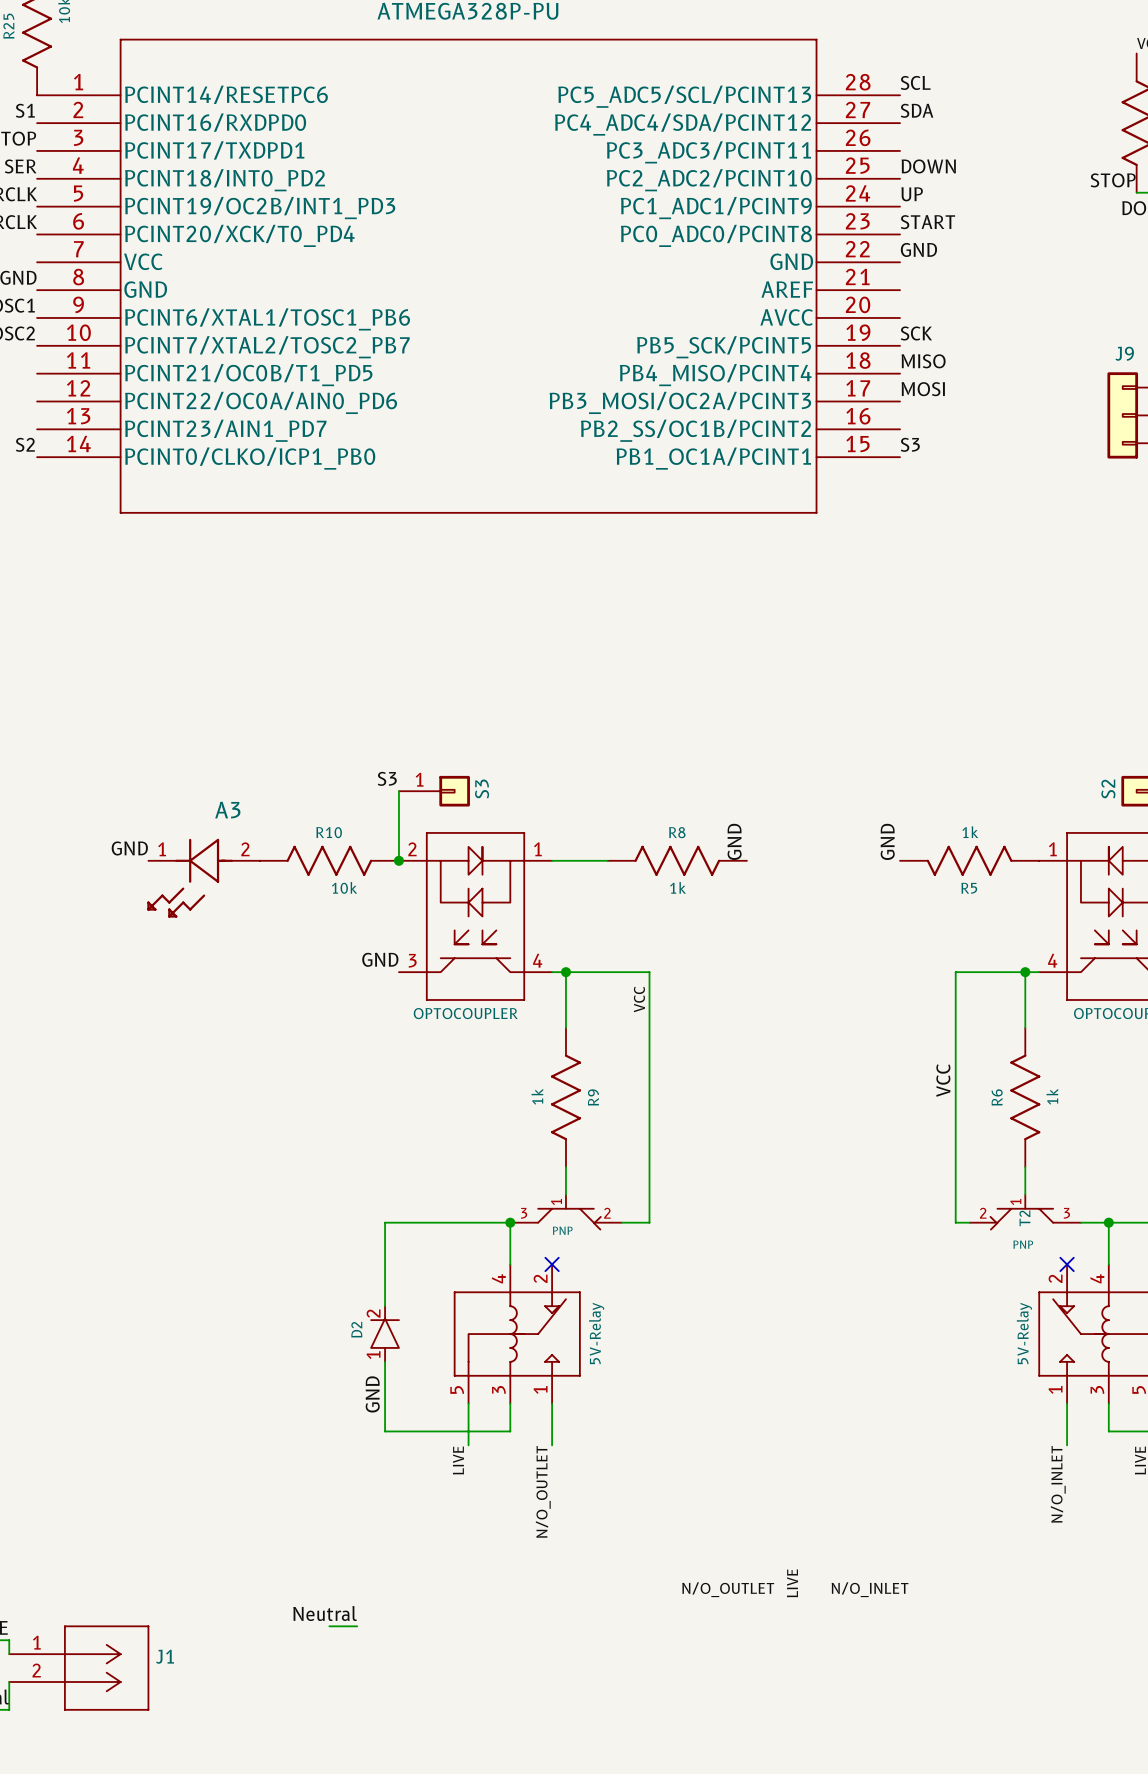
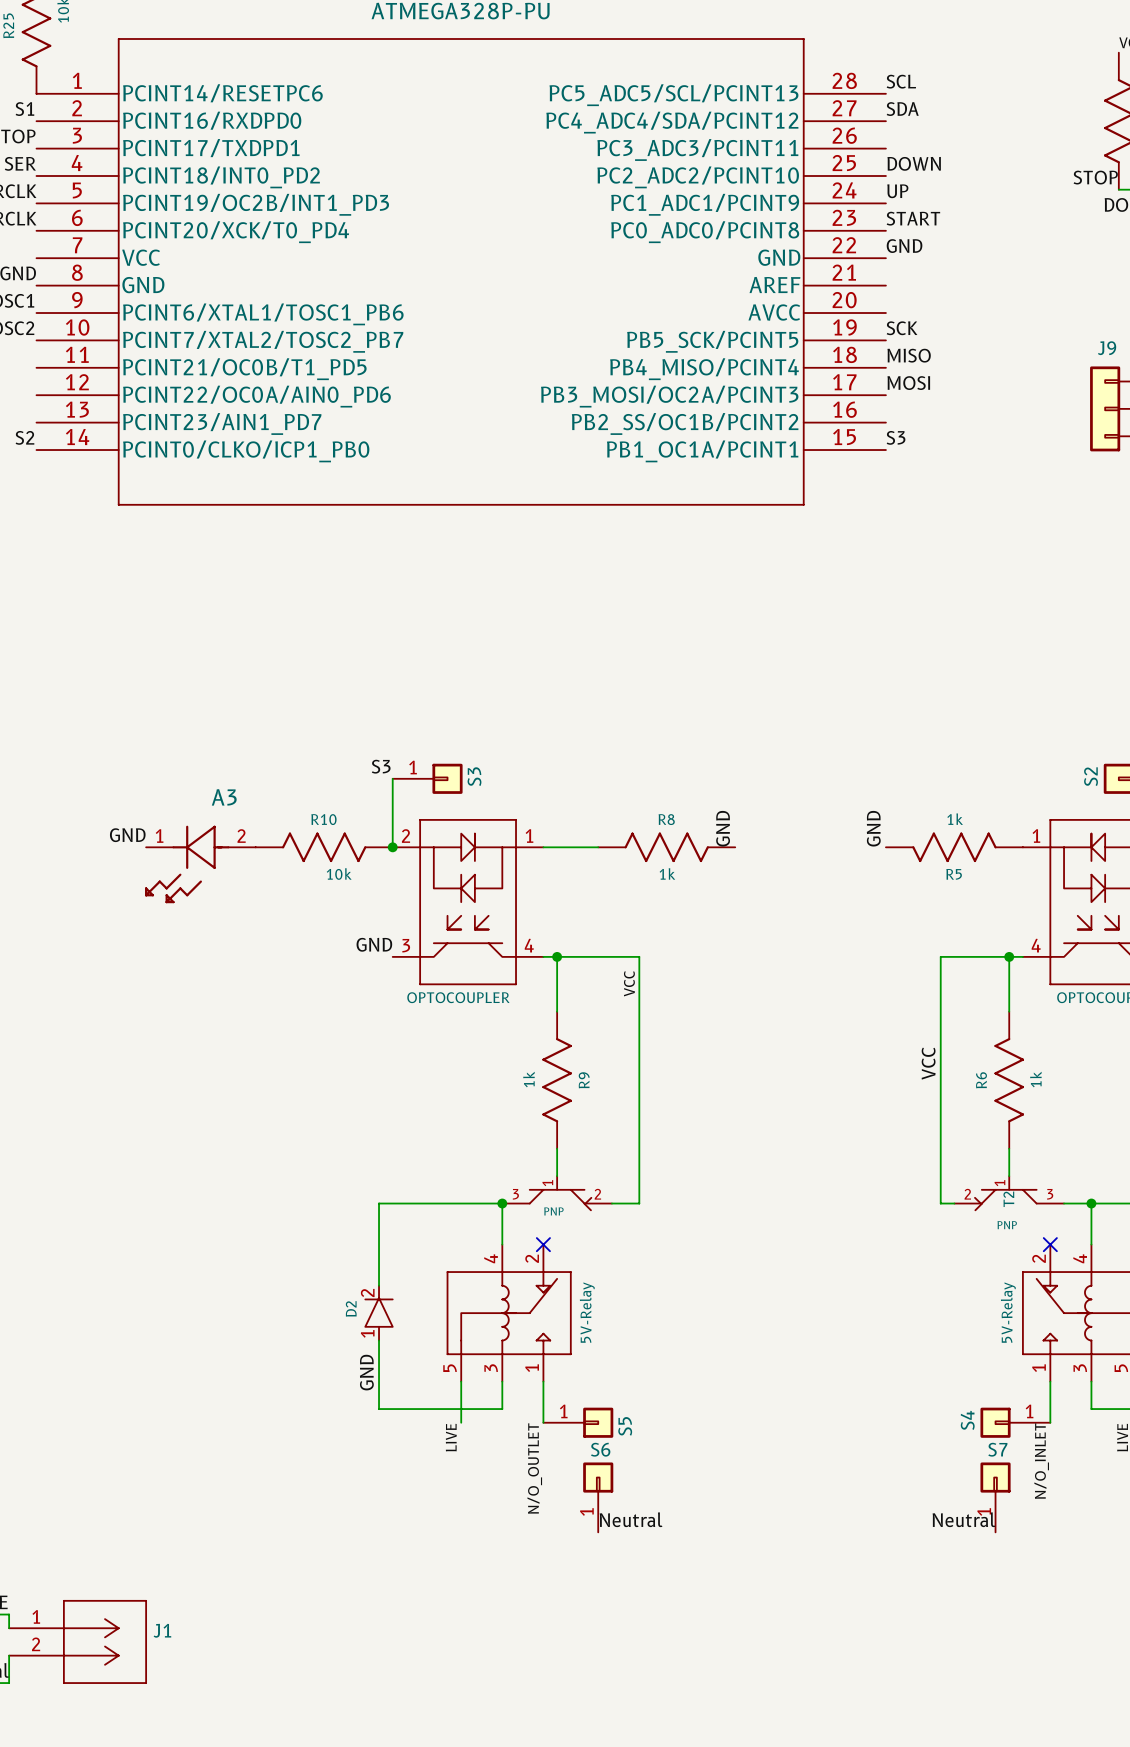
S5: none -> (578, 1422)
S4: none -> (1015, 1422)
S6: none -> (598, 1497)
S7: none -> (995, 1497)
label: none -> Neutral (963, 1519)
label: LIVE (792, 1583) -> none
label: N/O_OUTLET (728, 1589) -> none
label: N/O_INLET (870, 1589) -> none
label position: Neutral (325, 1613) -> Neutral (631, 1519)
wire: (329, 1626) (357, 1626) -> none

